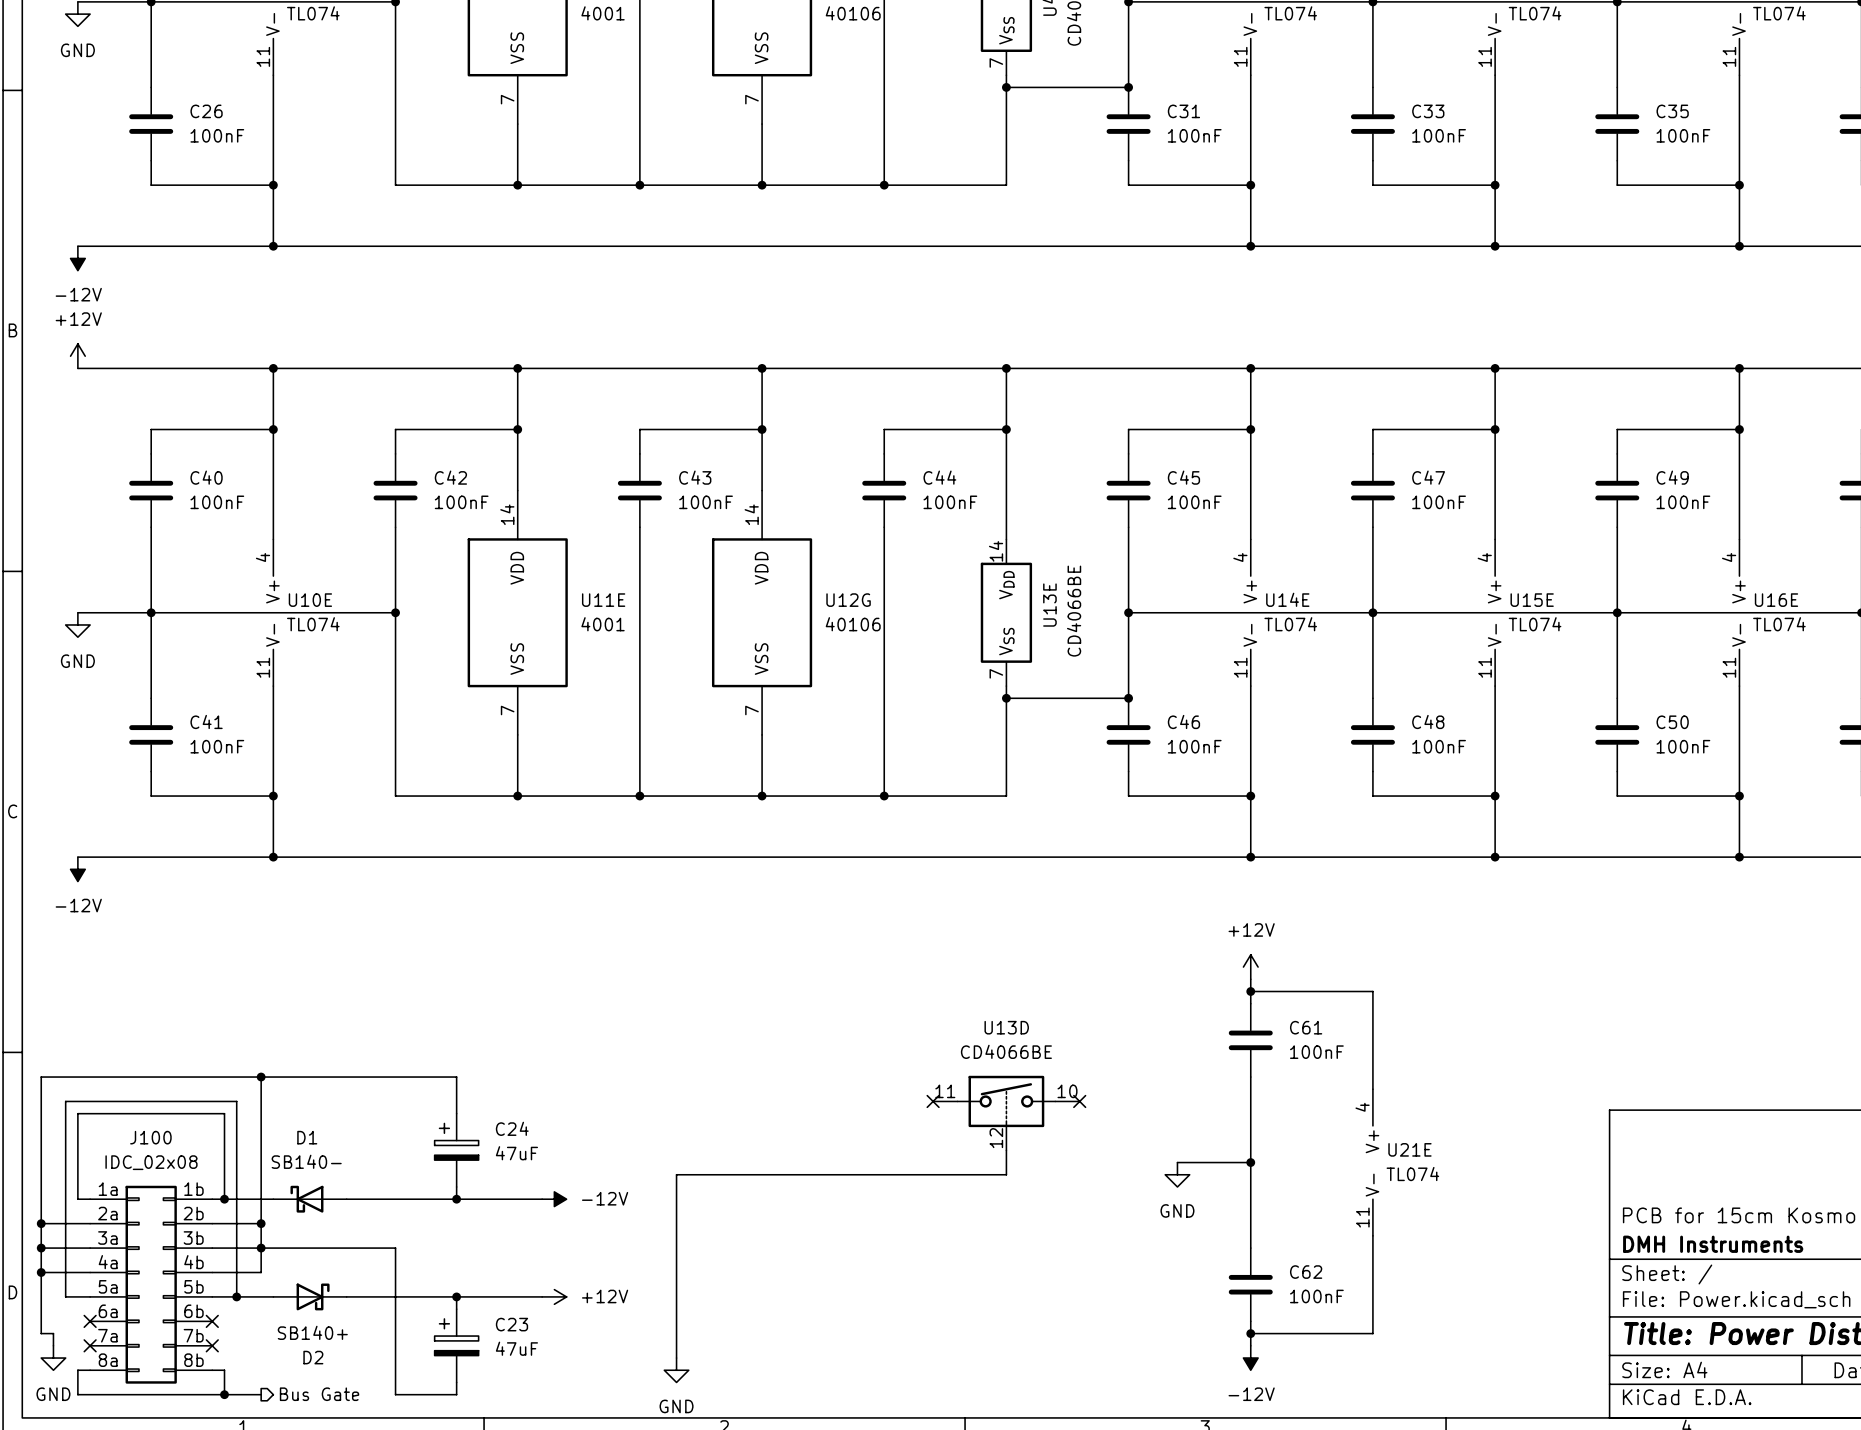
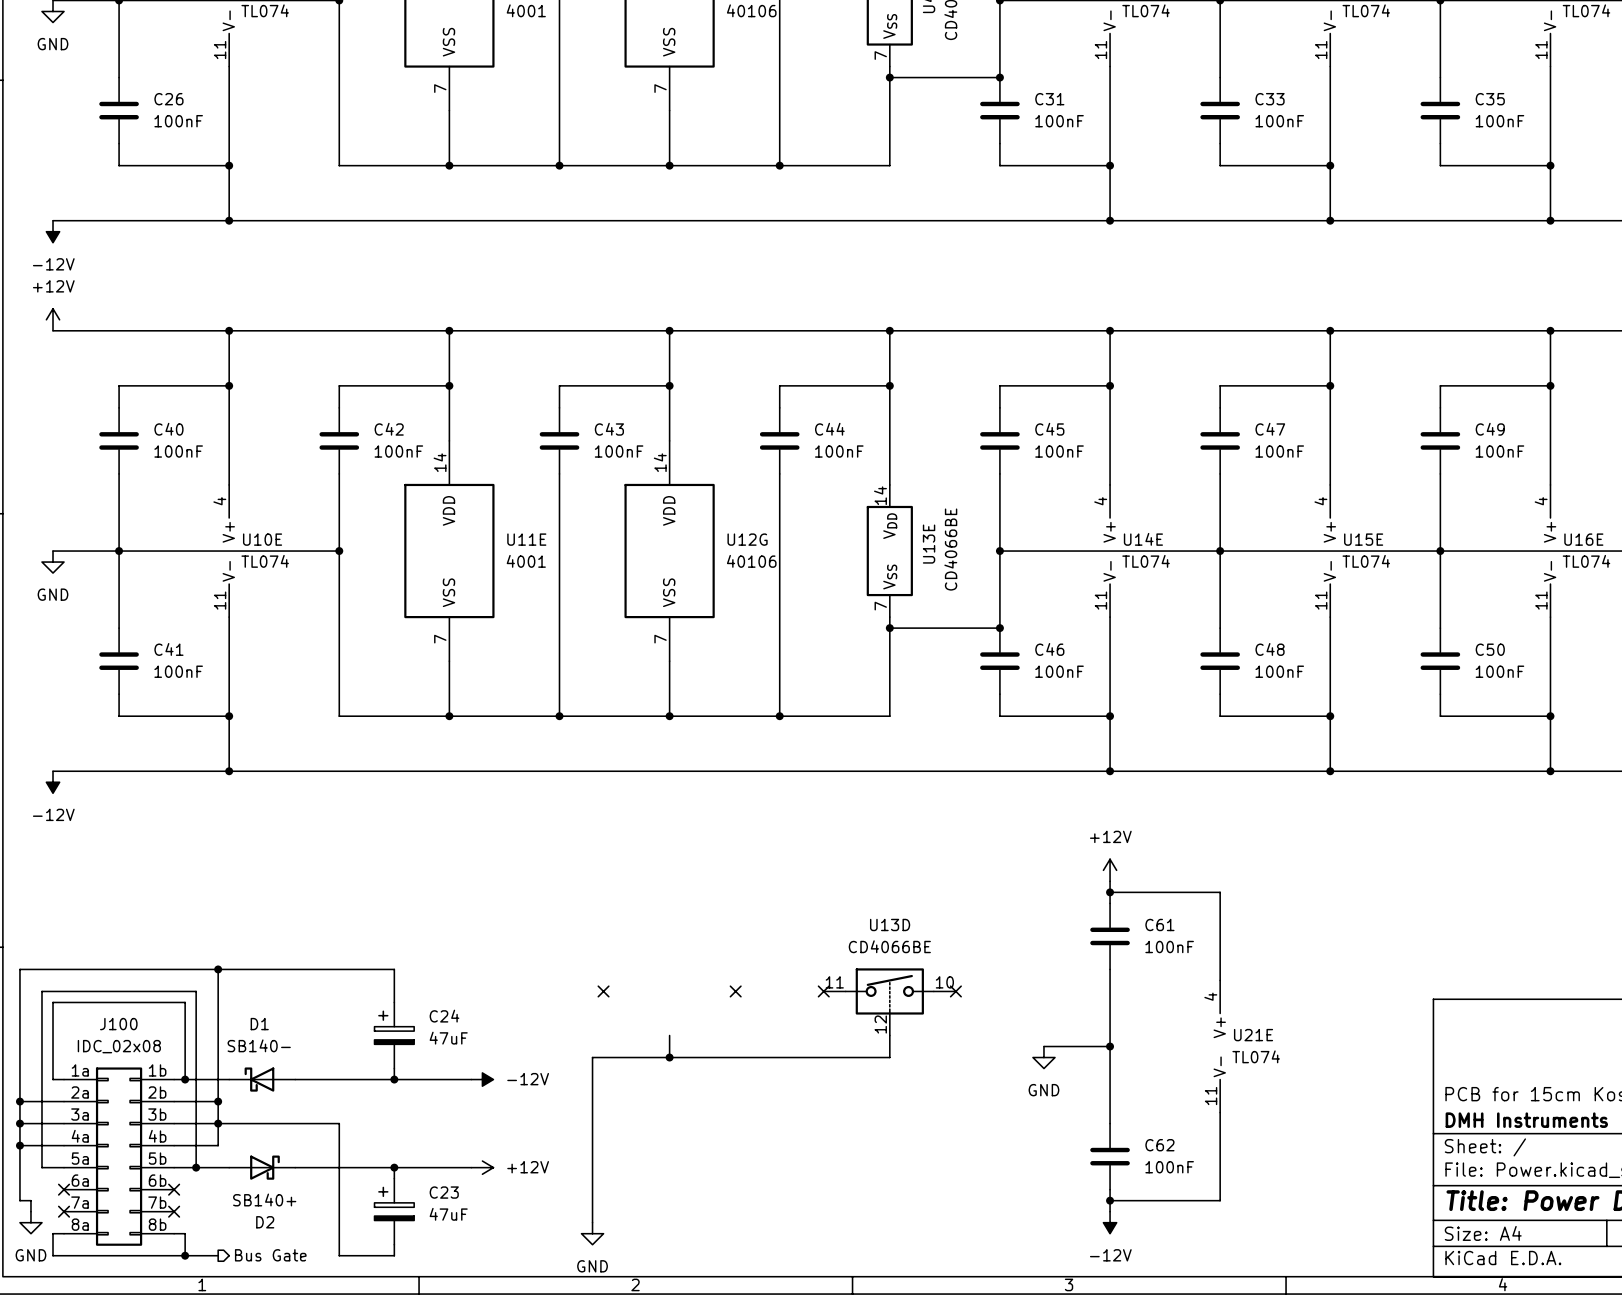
no-connect mark: none -> (603, 991)
no-connect mark: none -> (735, 991)
wire: none -> (669, 1035) (669, 1057)
junction: none -> (669, 1057)

